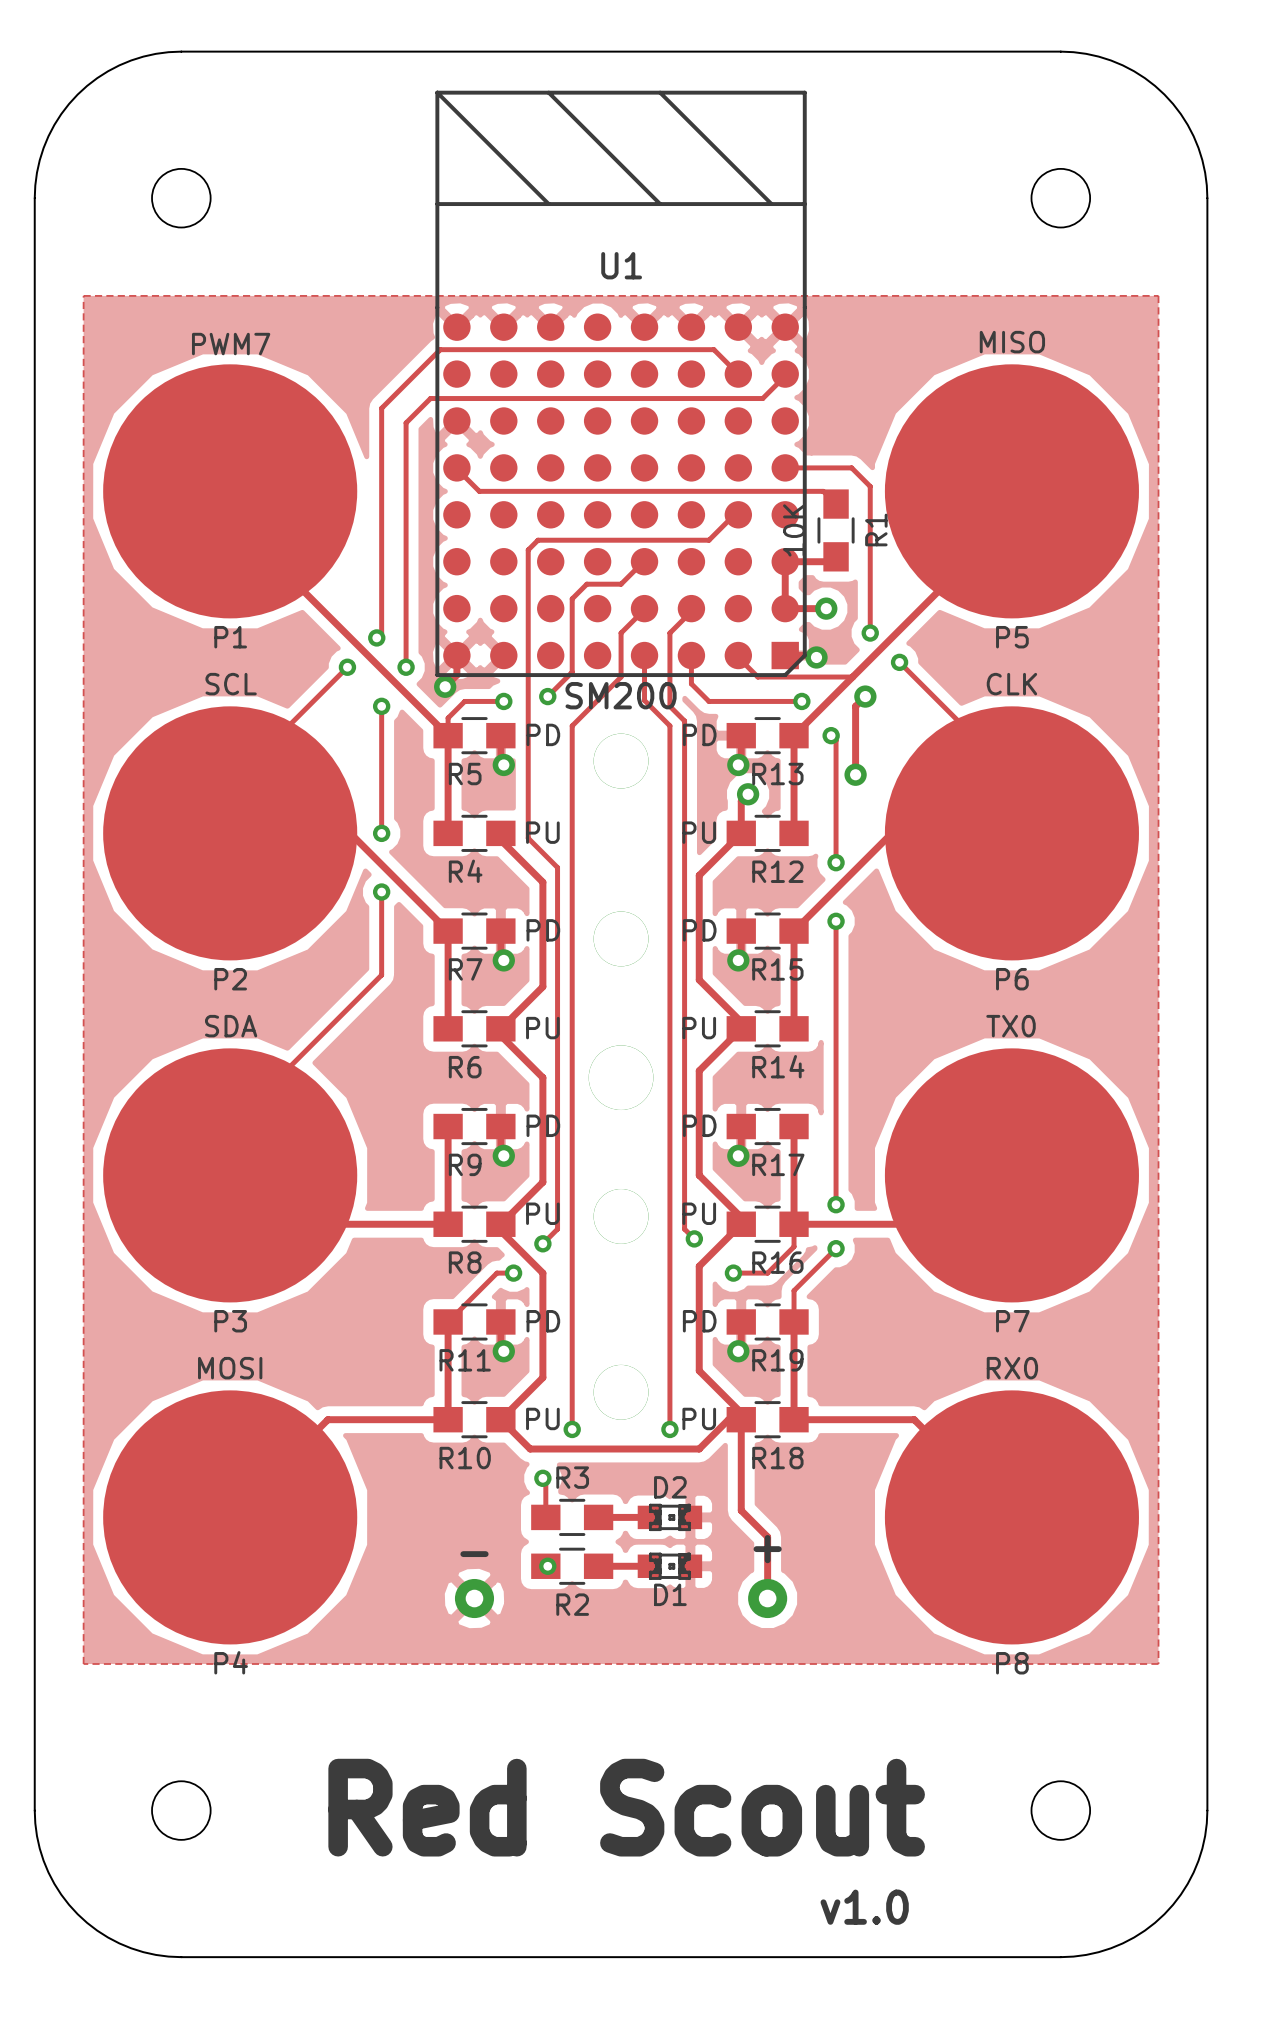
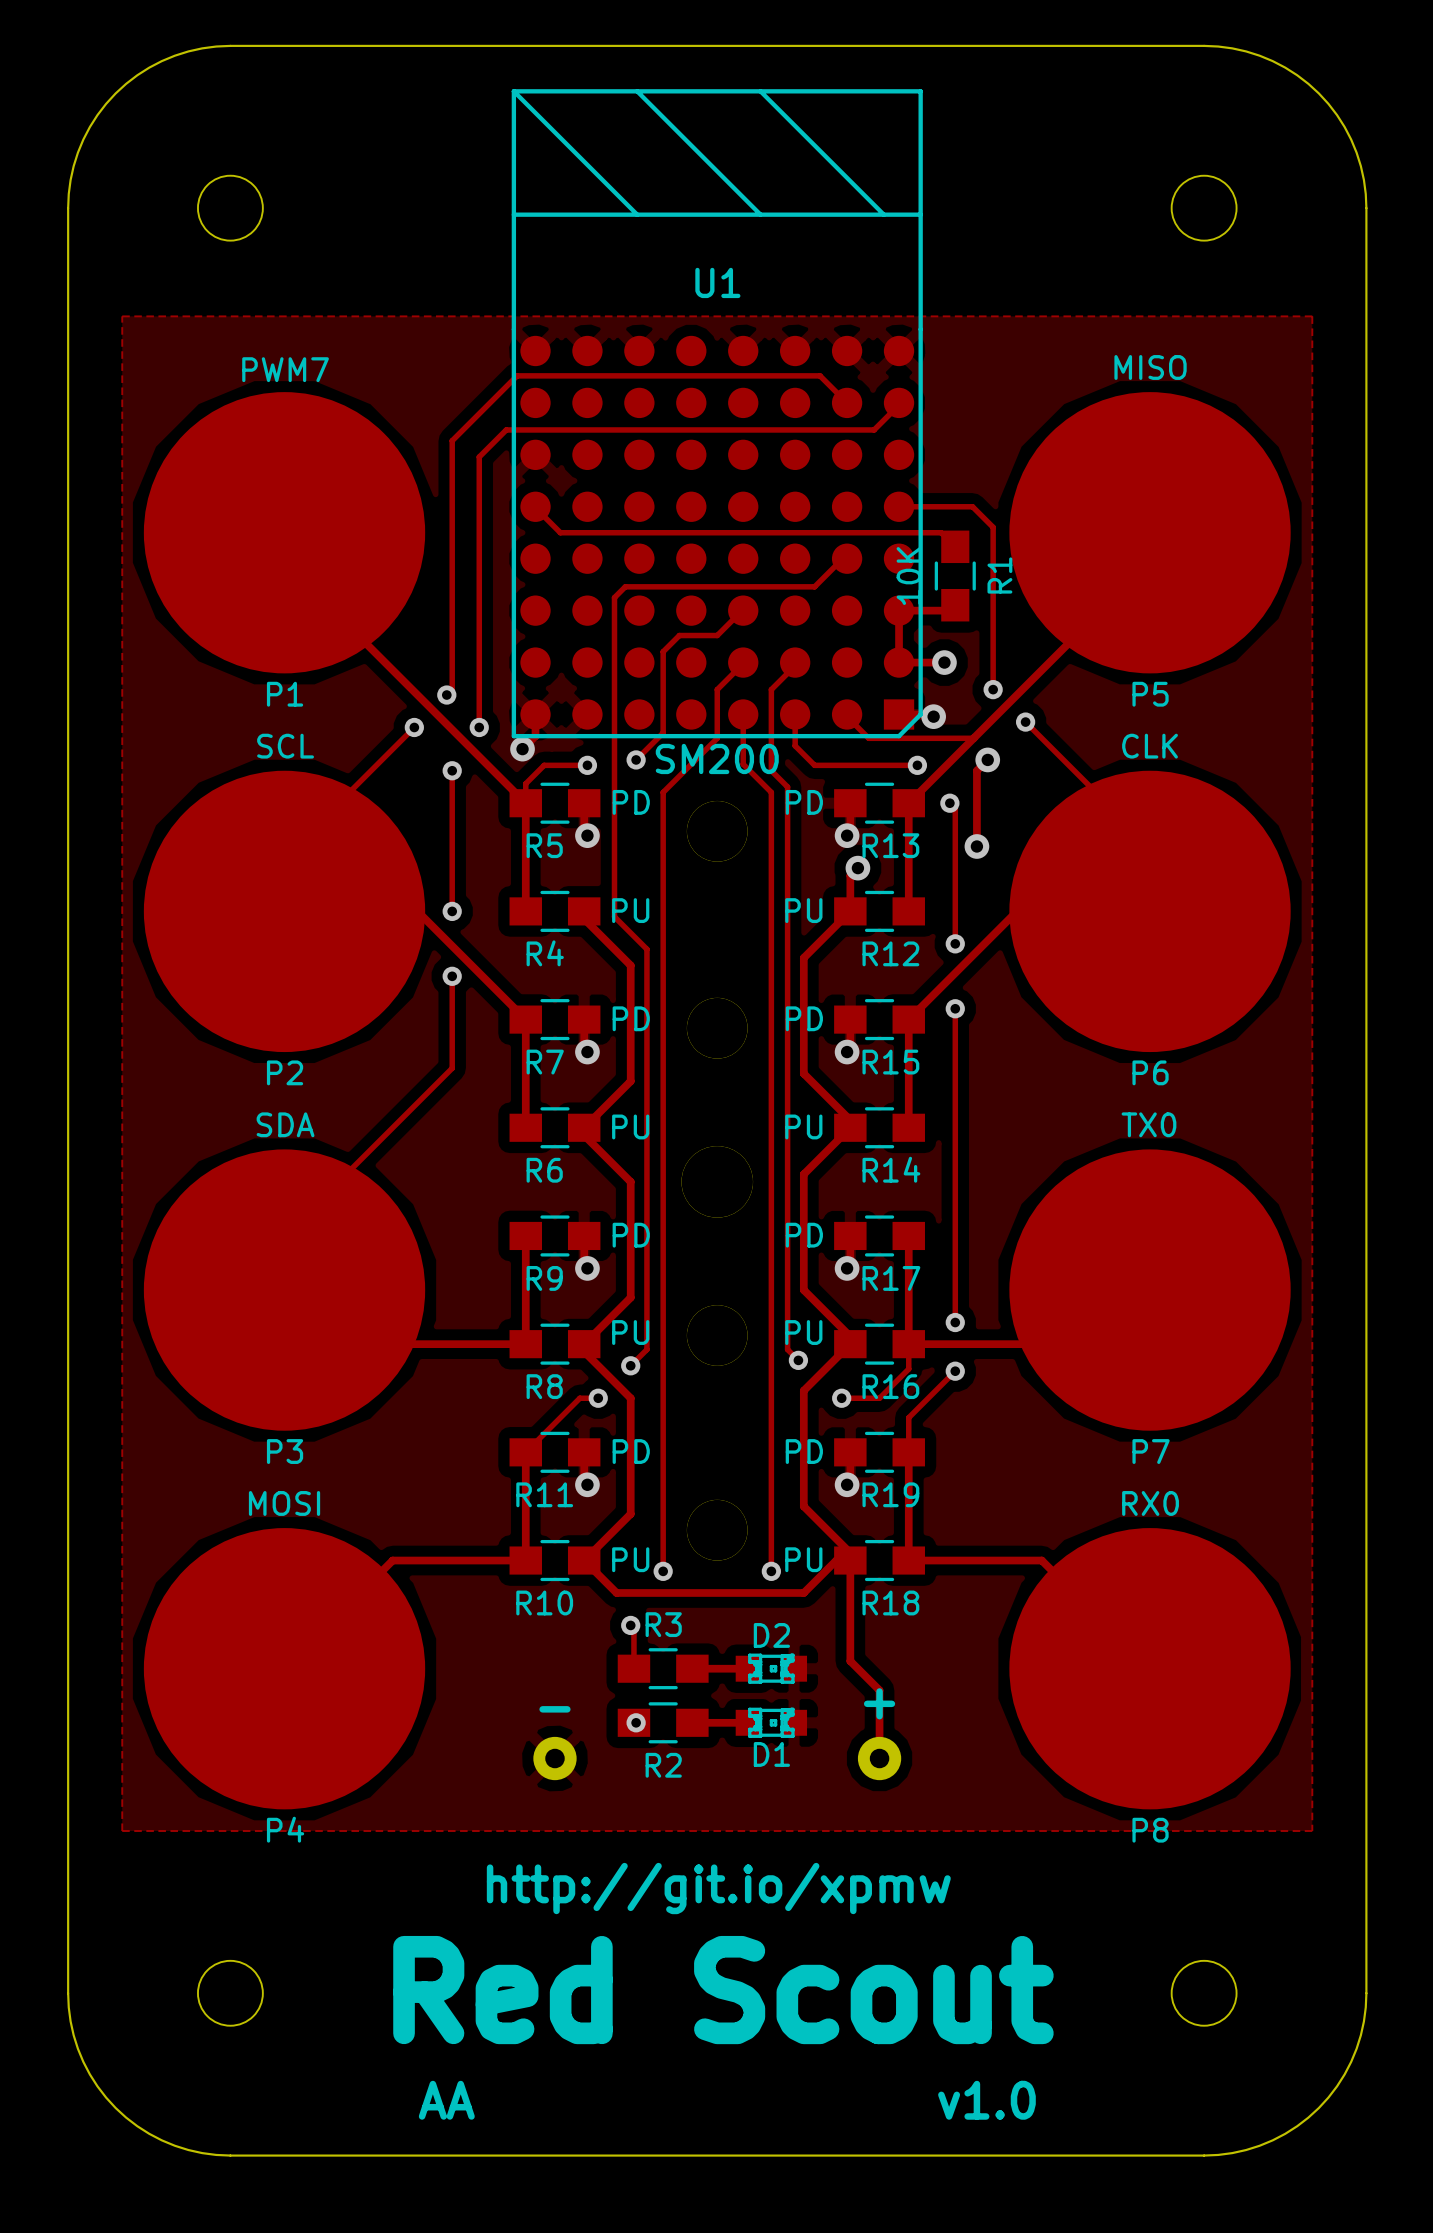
text: none -> http://git.io/xpmw (718, 1888)
text: none -> AA (446, 2100)

